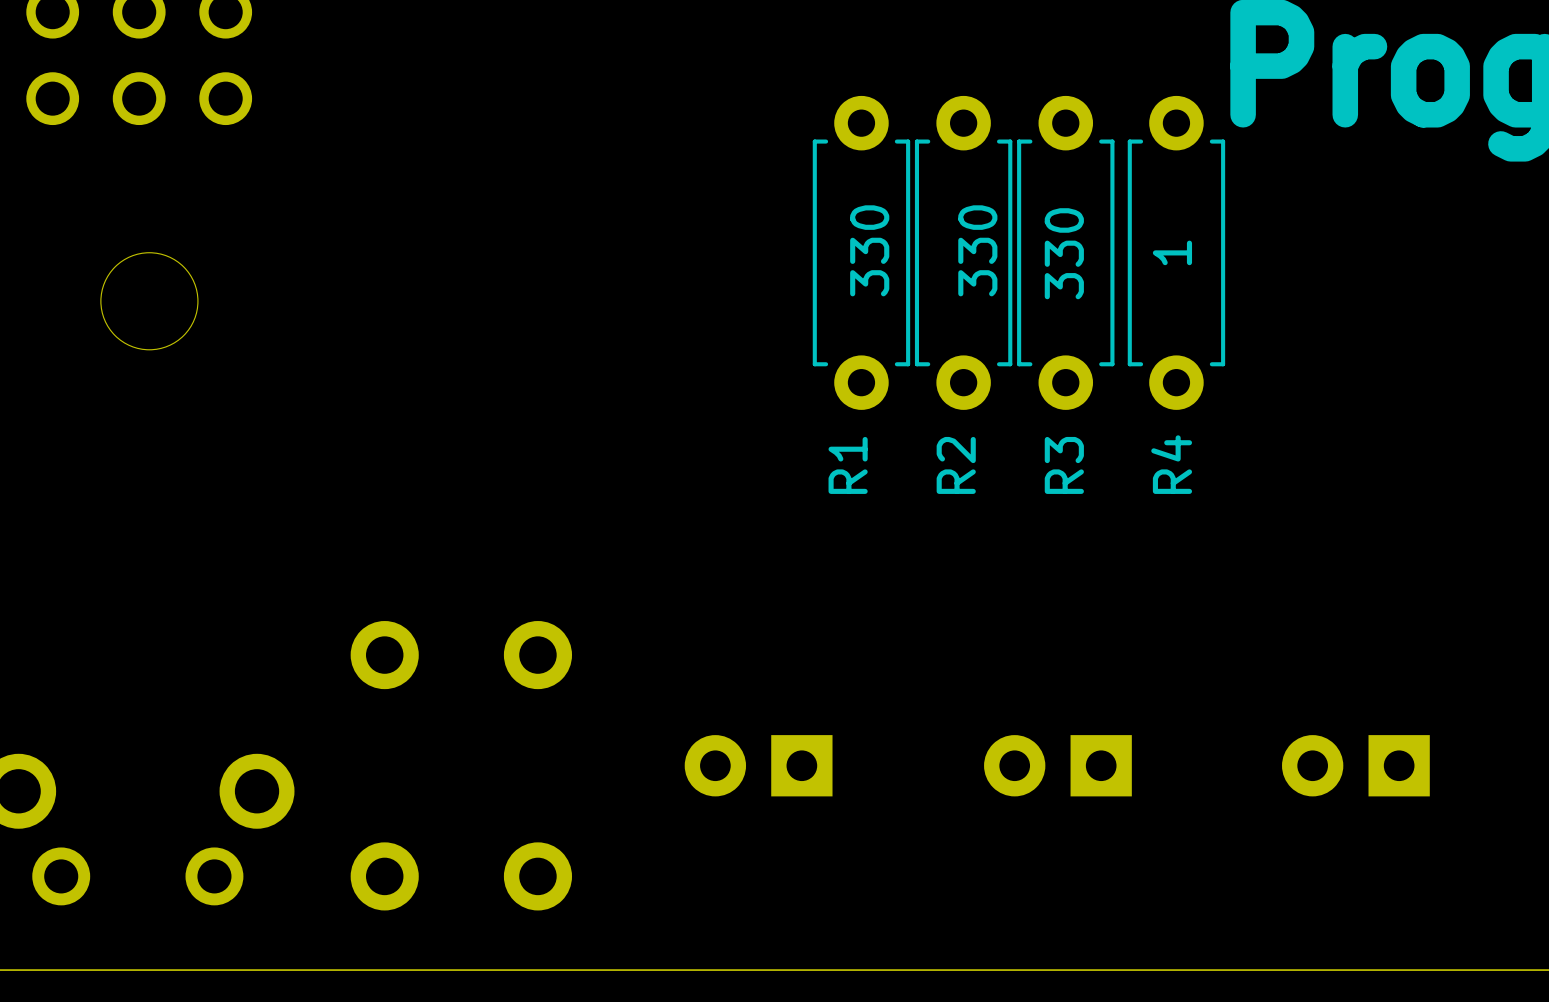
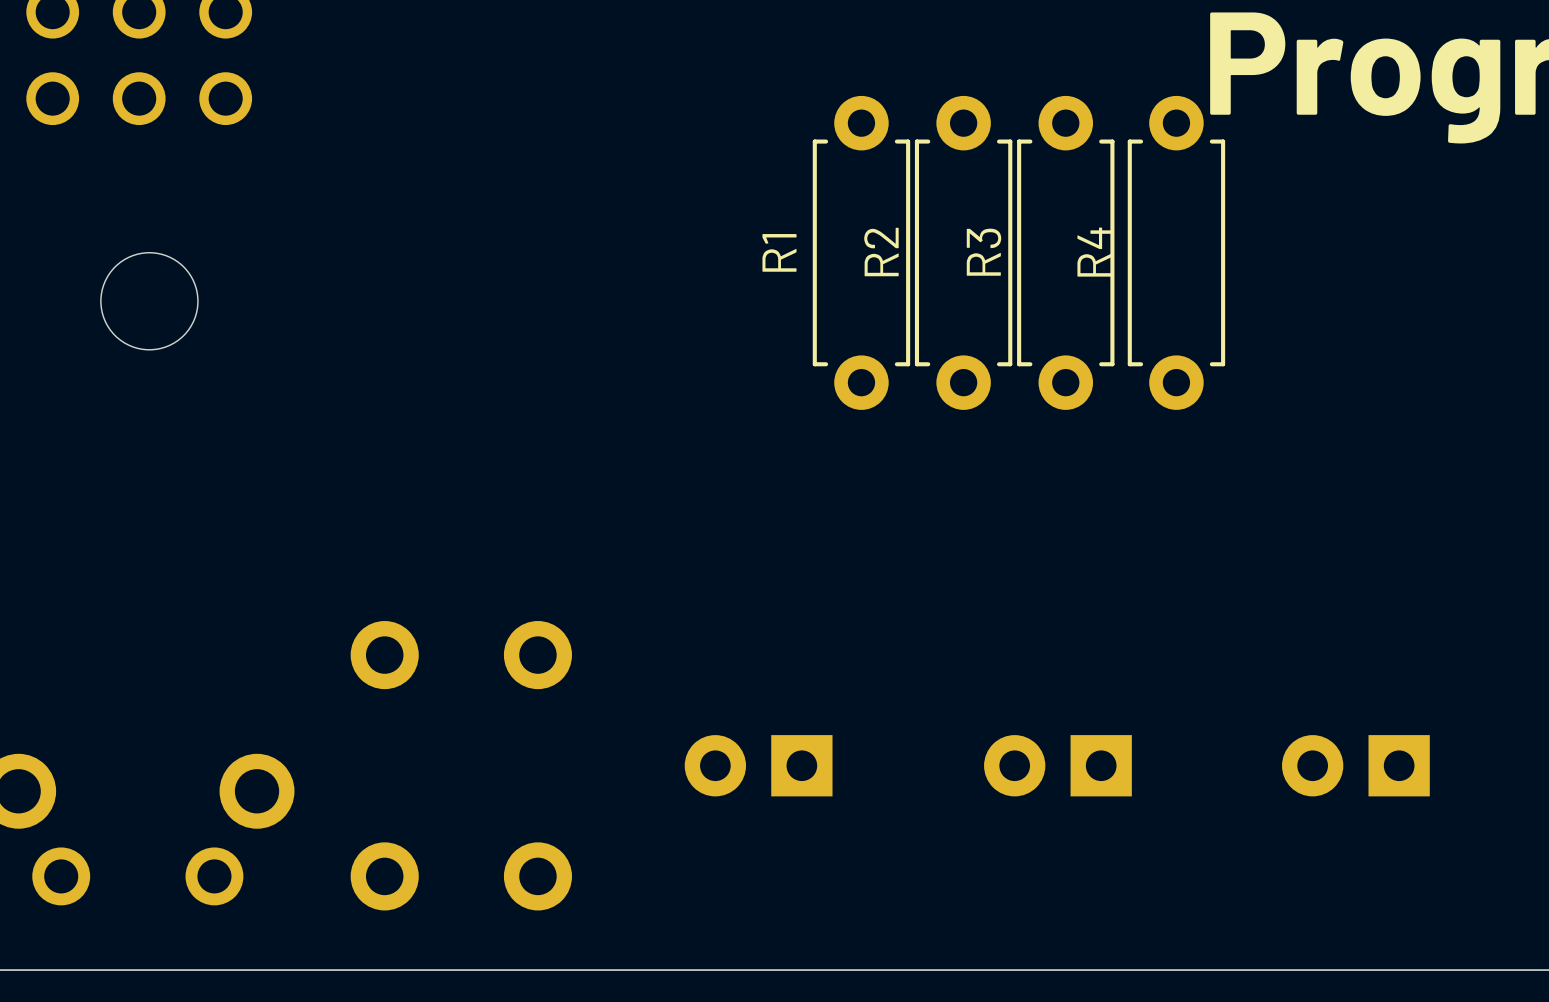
R1 value: 330 (869, 250) -> none
R2 value: 330 (977, 250) -> none
R4 value: 1 (1172, 252) -> none
R3 value: 330 (1064, 253) -> none
R4 name position: R4 (1171, 464) -> R4 (1094, 252)
R1 name position: R1 (848, 465) -> R1 (779, 252)
R2 name position: R2 (956, 465) -> R2 (881, 252)
R3 name position: R3 (1064, 465) -> R3 (983, 252)

